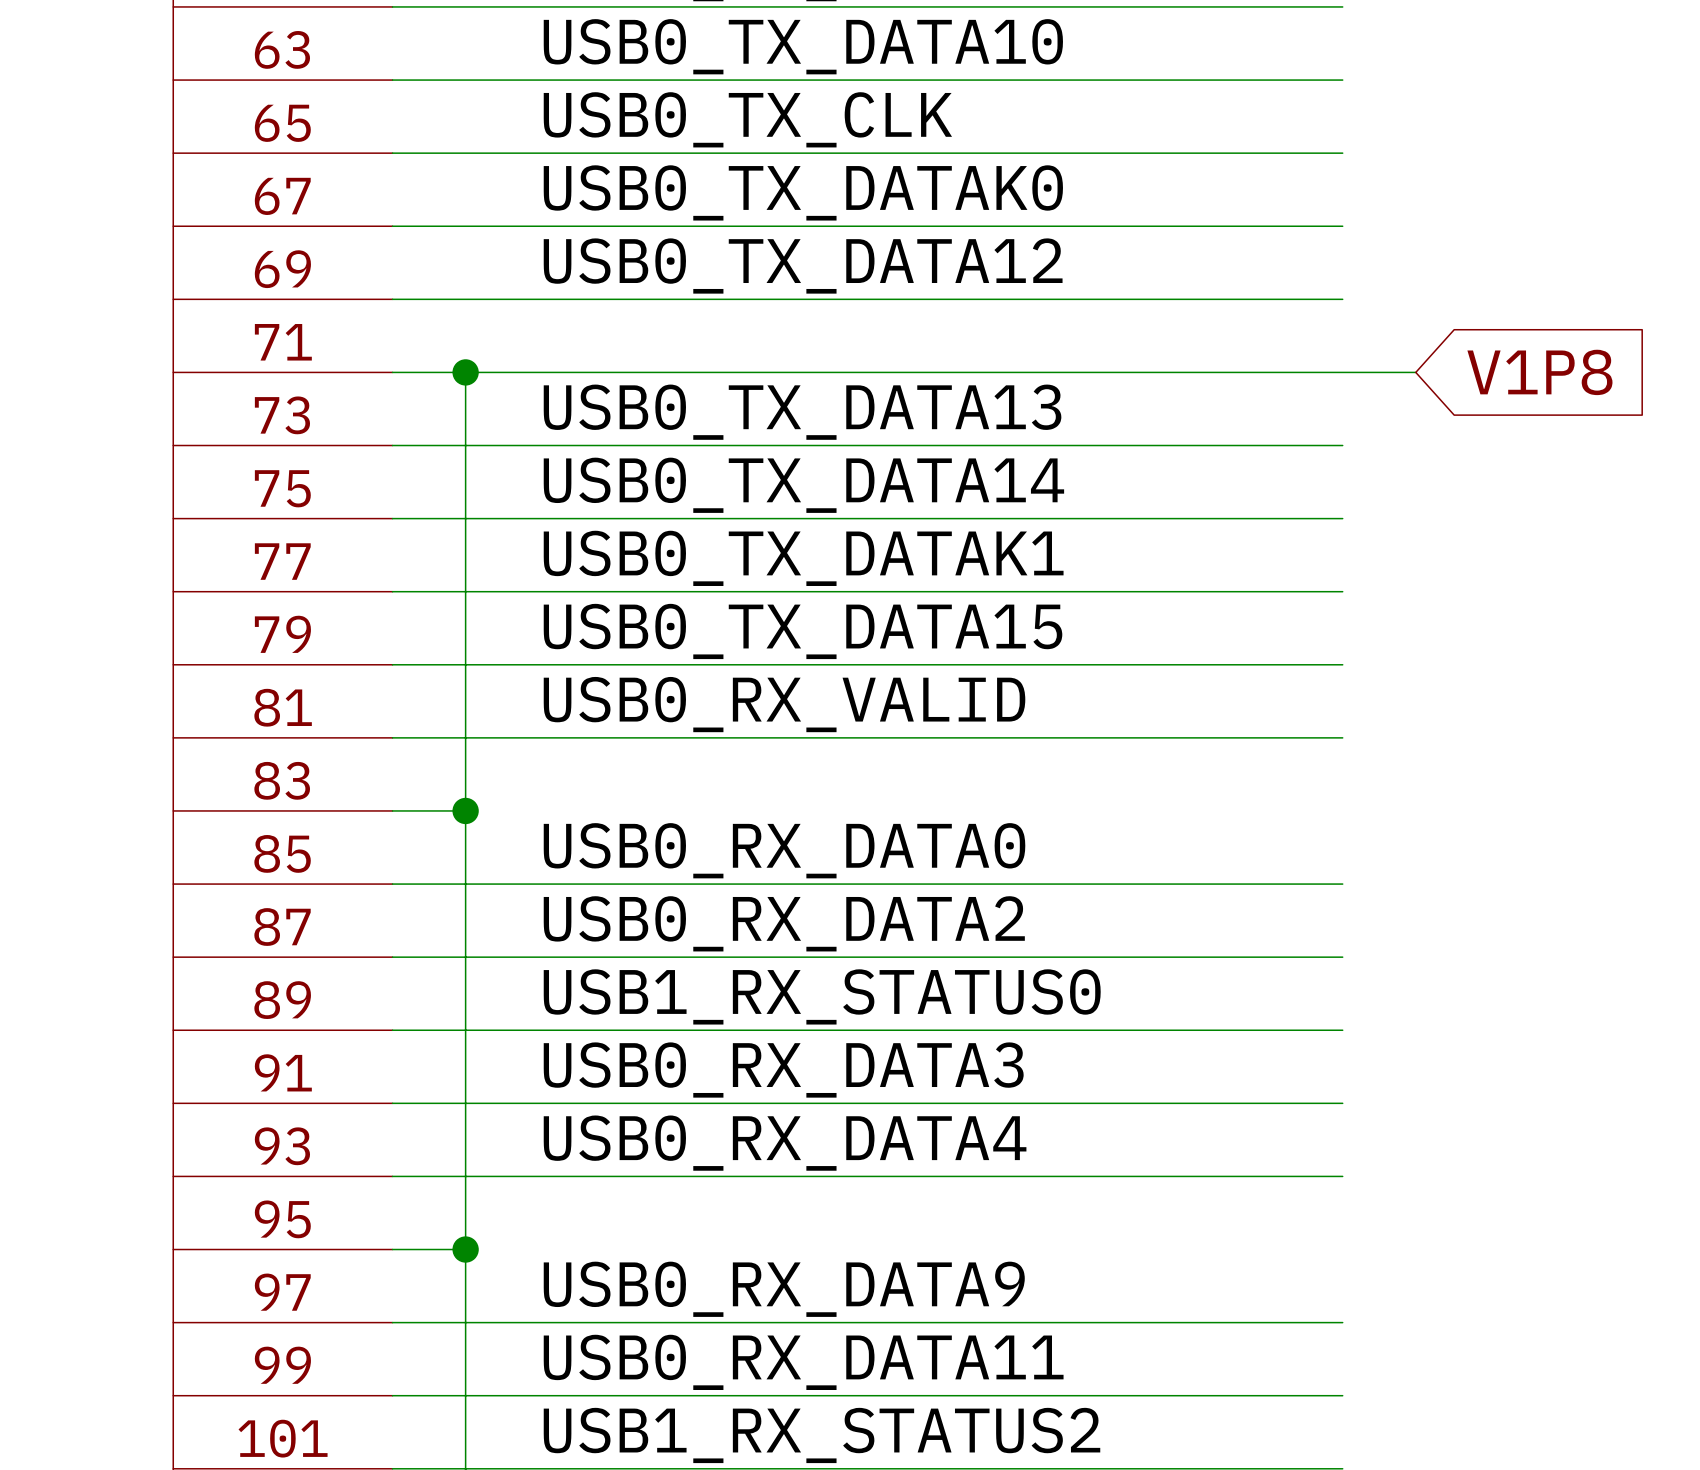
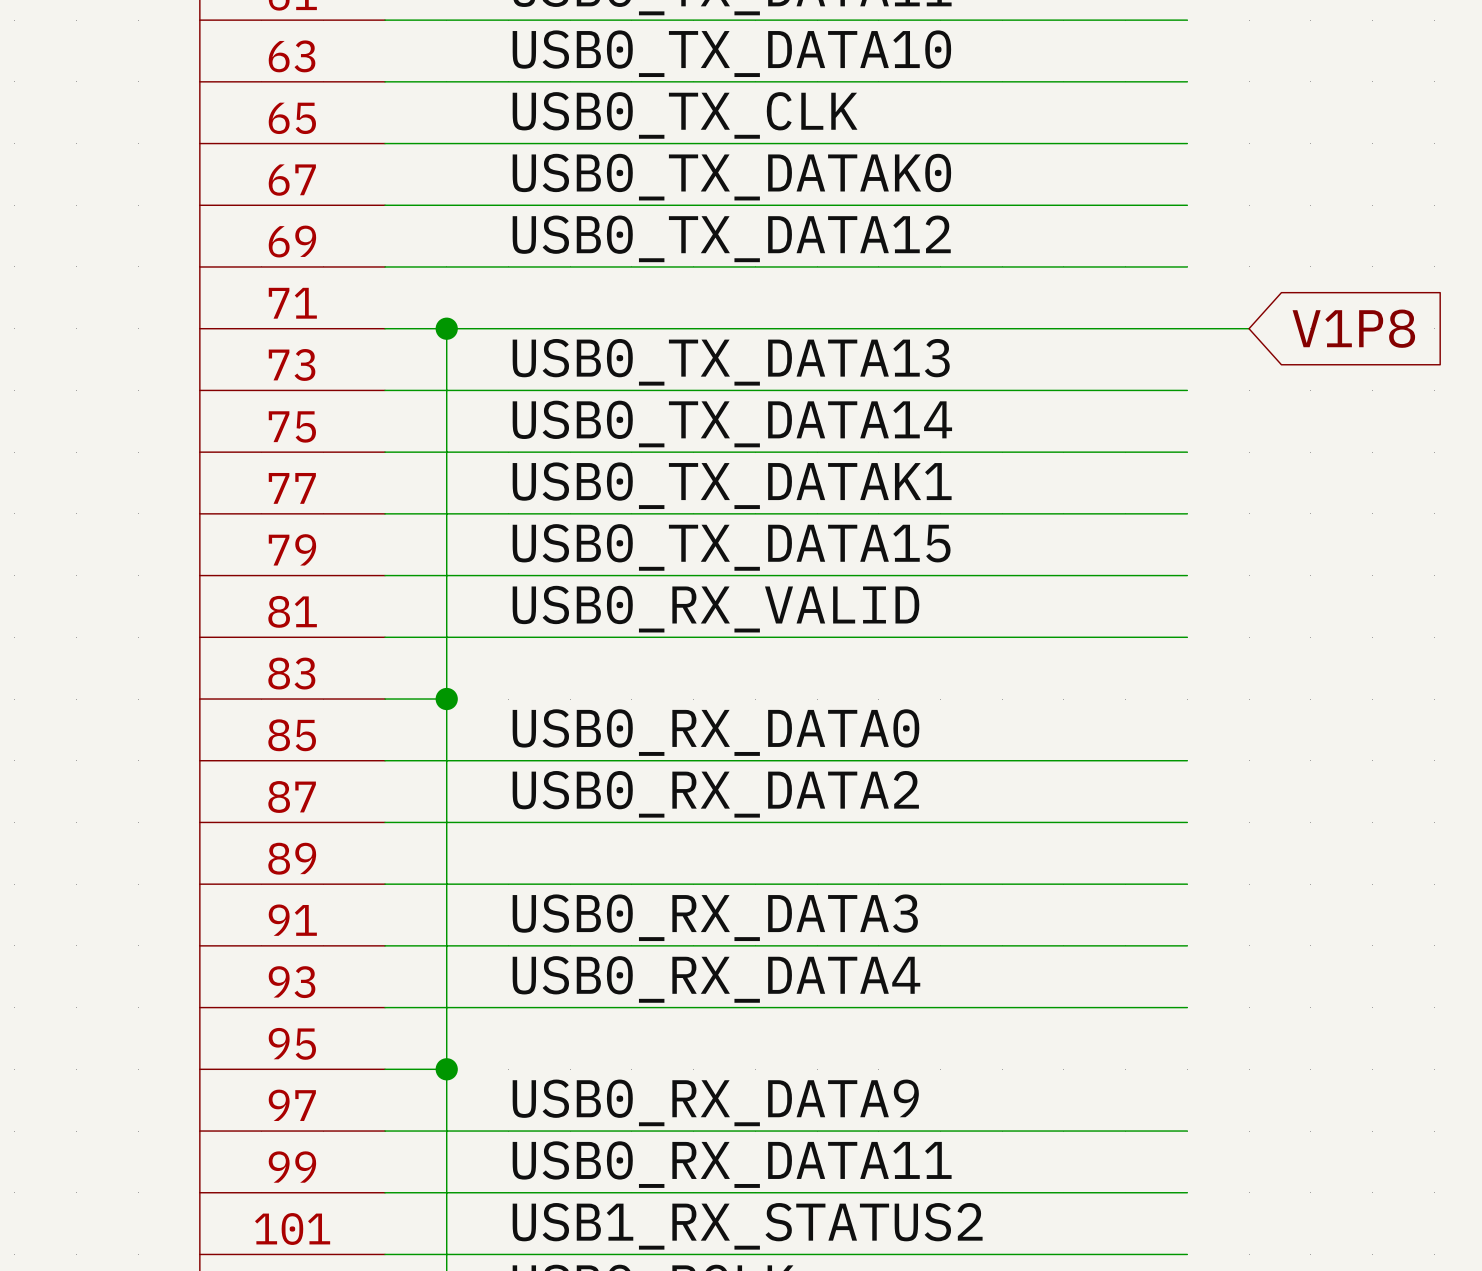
label: USB1_RX_STATUS0 (822, 996) -> none

